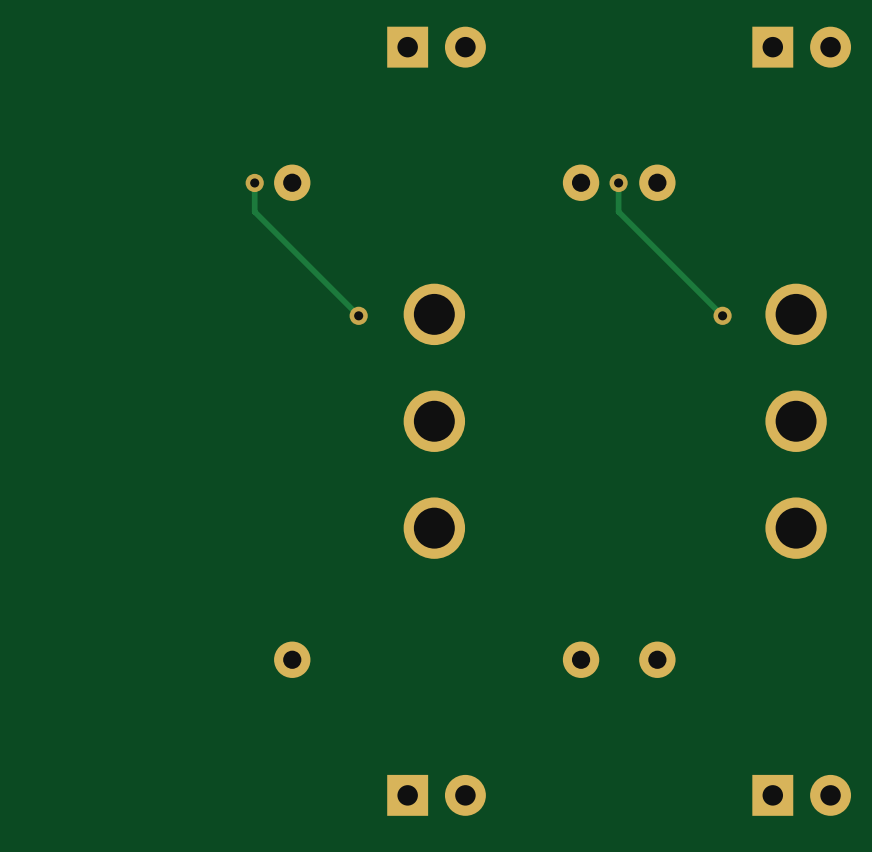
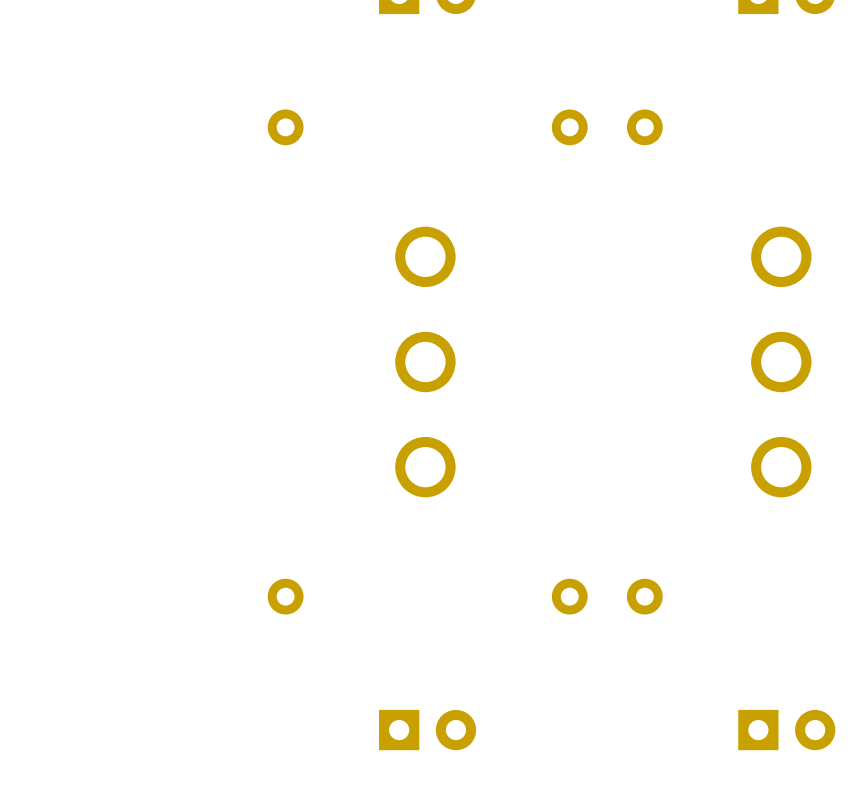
track: (254, 182) (254, 211) (358, 315) -> none
via: (254, 182) -> none
track: (618, 182) (618, 211) (722, 315) -> none
via: (618, 182) -> none
via: (358, 315) -> none
via: (722, 315) -> none

